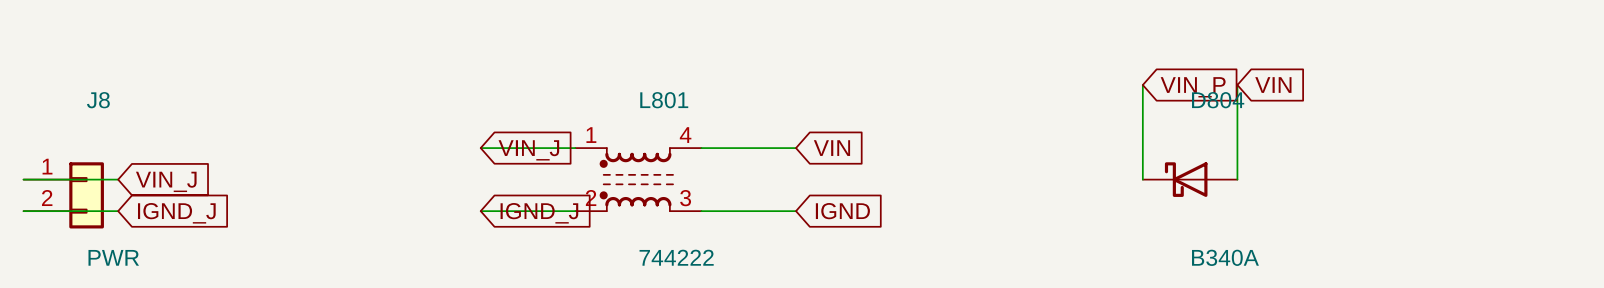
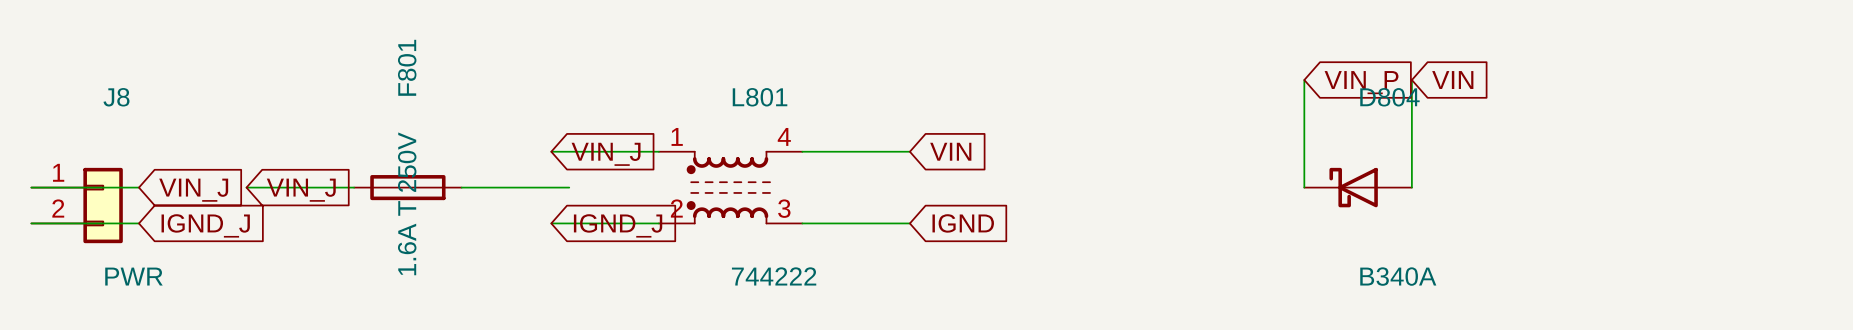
wire: none -> (246, 187) (354, 187)
F801: none -> 1.6A T 250V (407, 187)
wire: none -> (461, 187) (569, 187)
global label: none -> VIN_J (301, 190)

